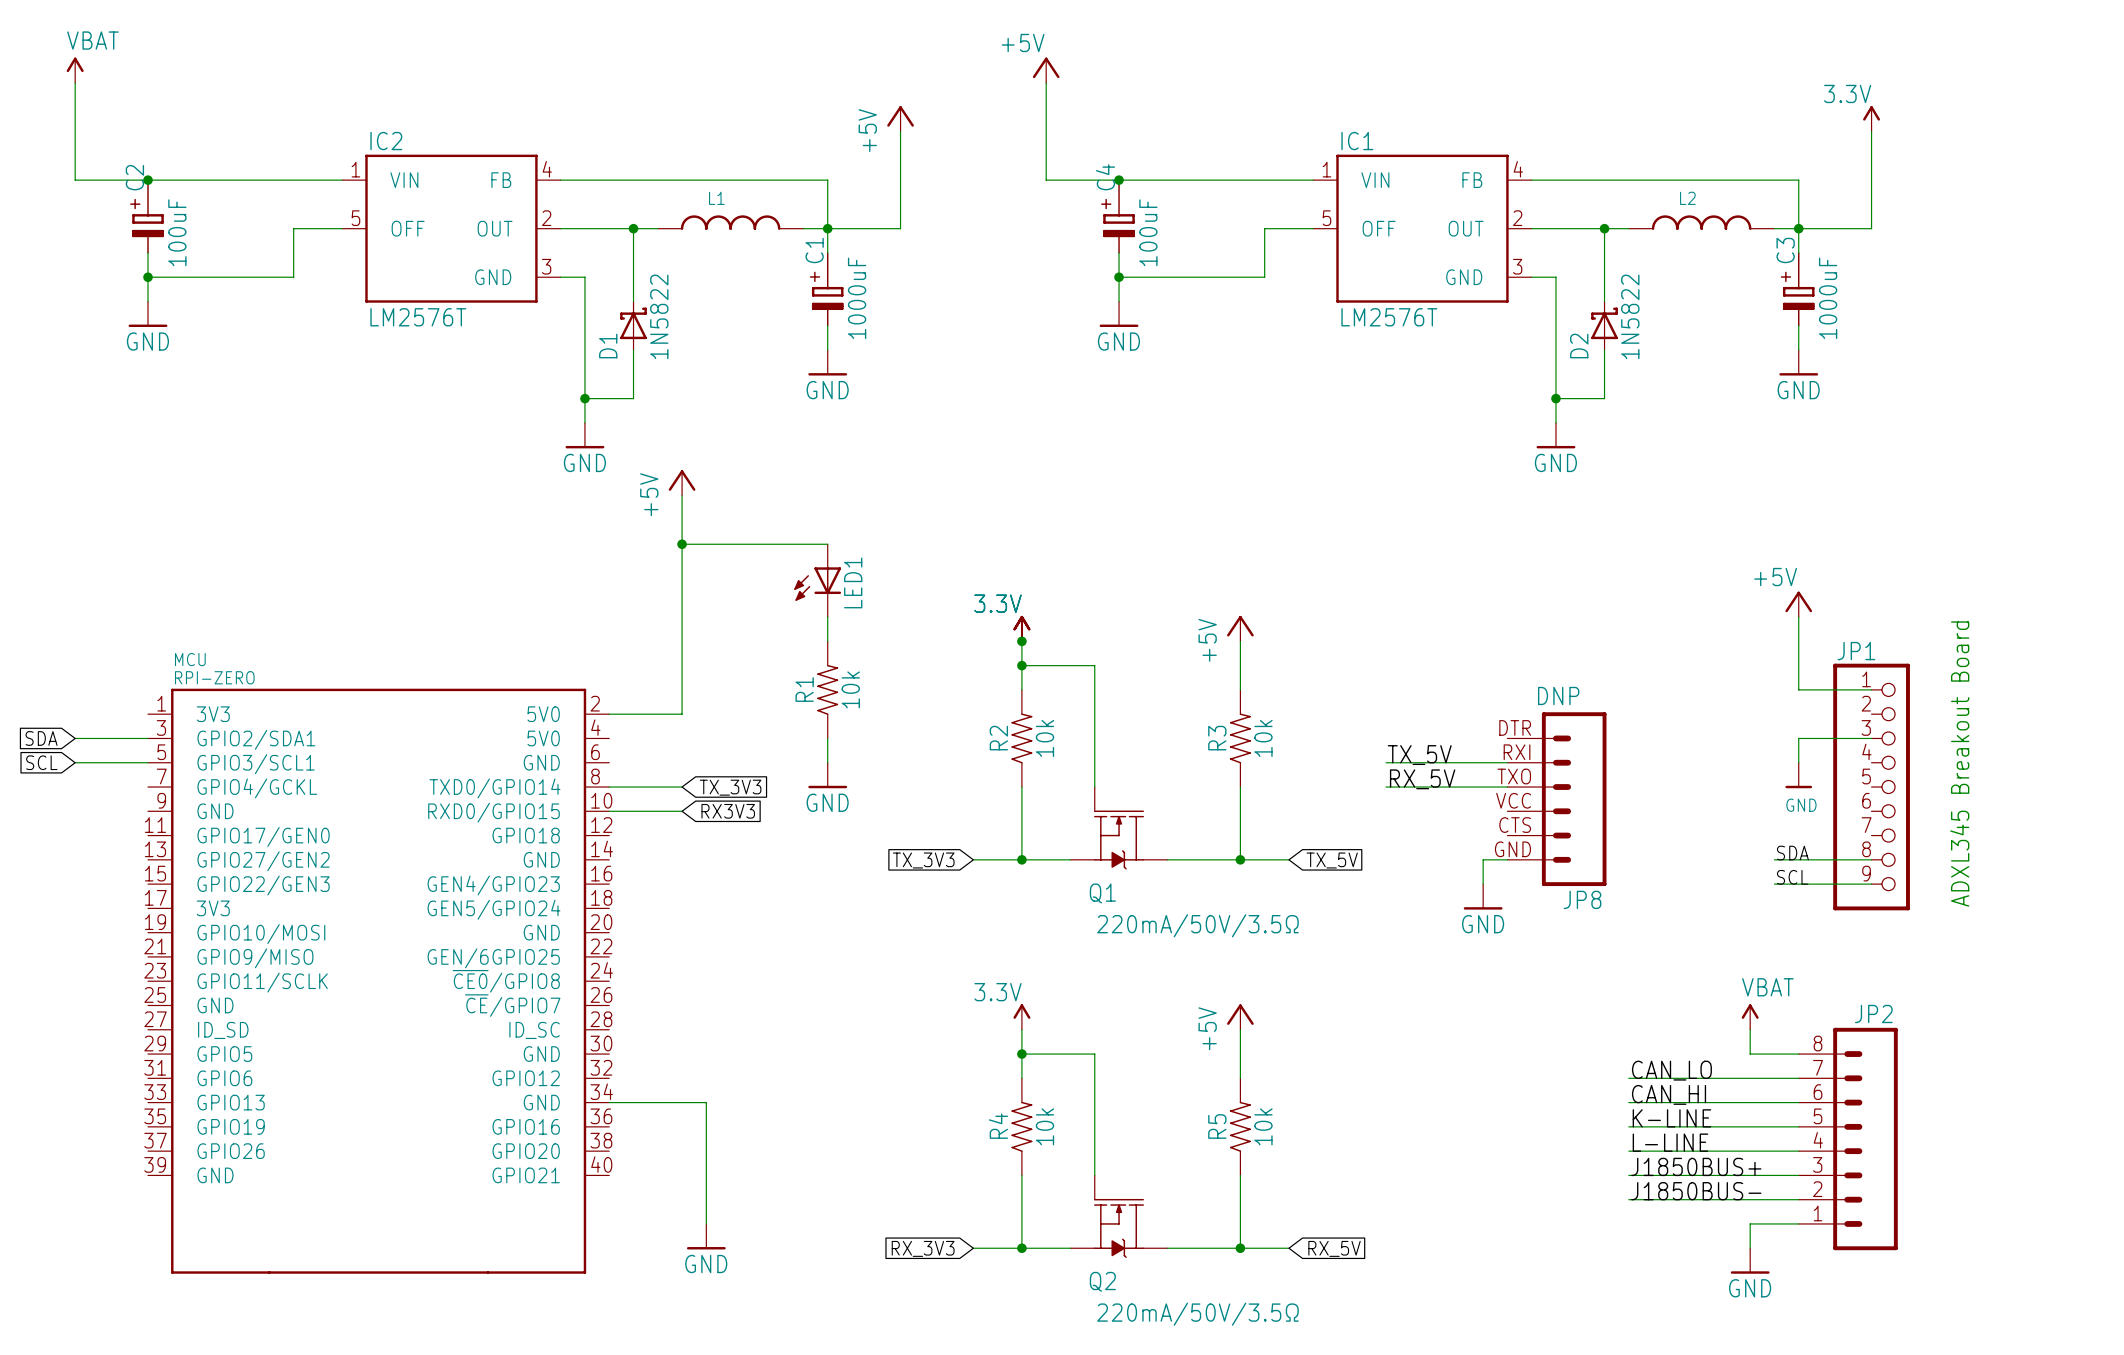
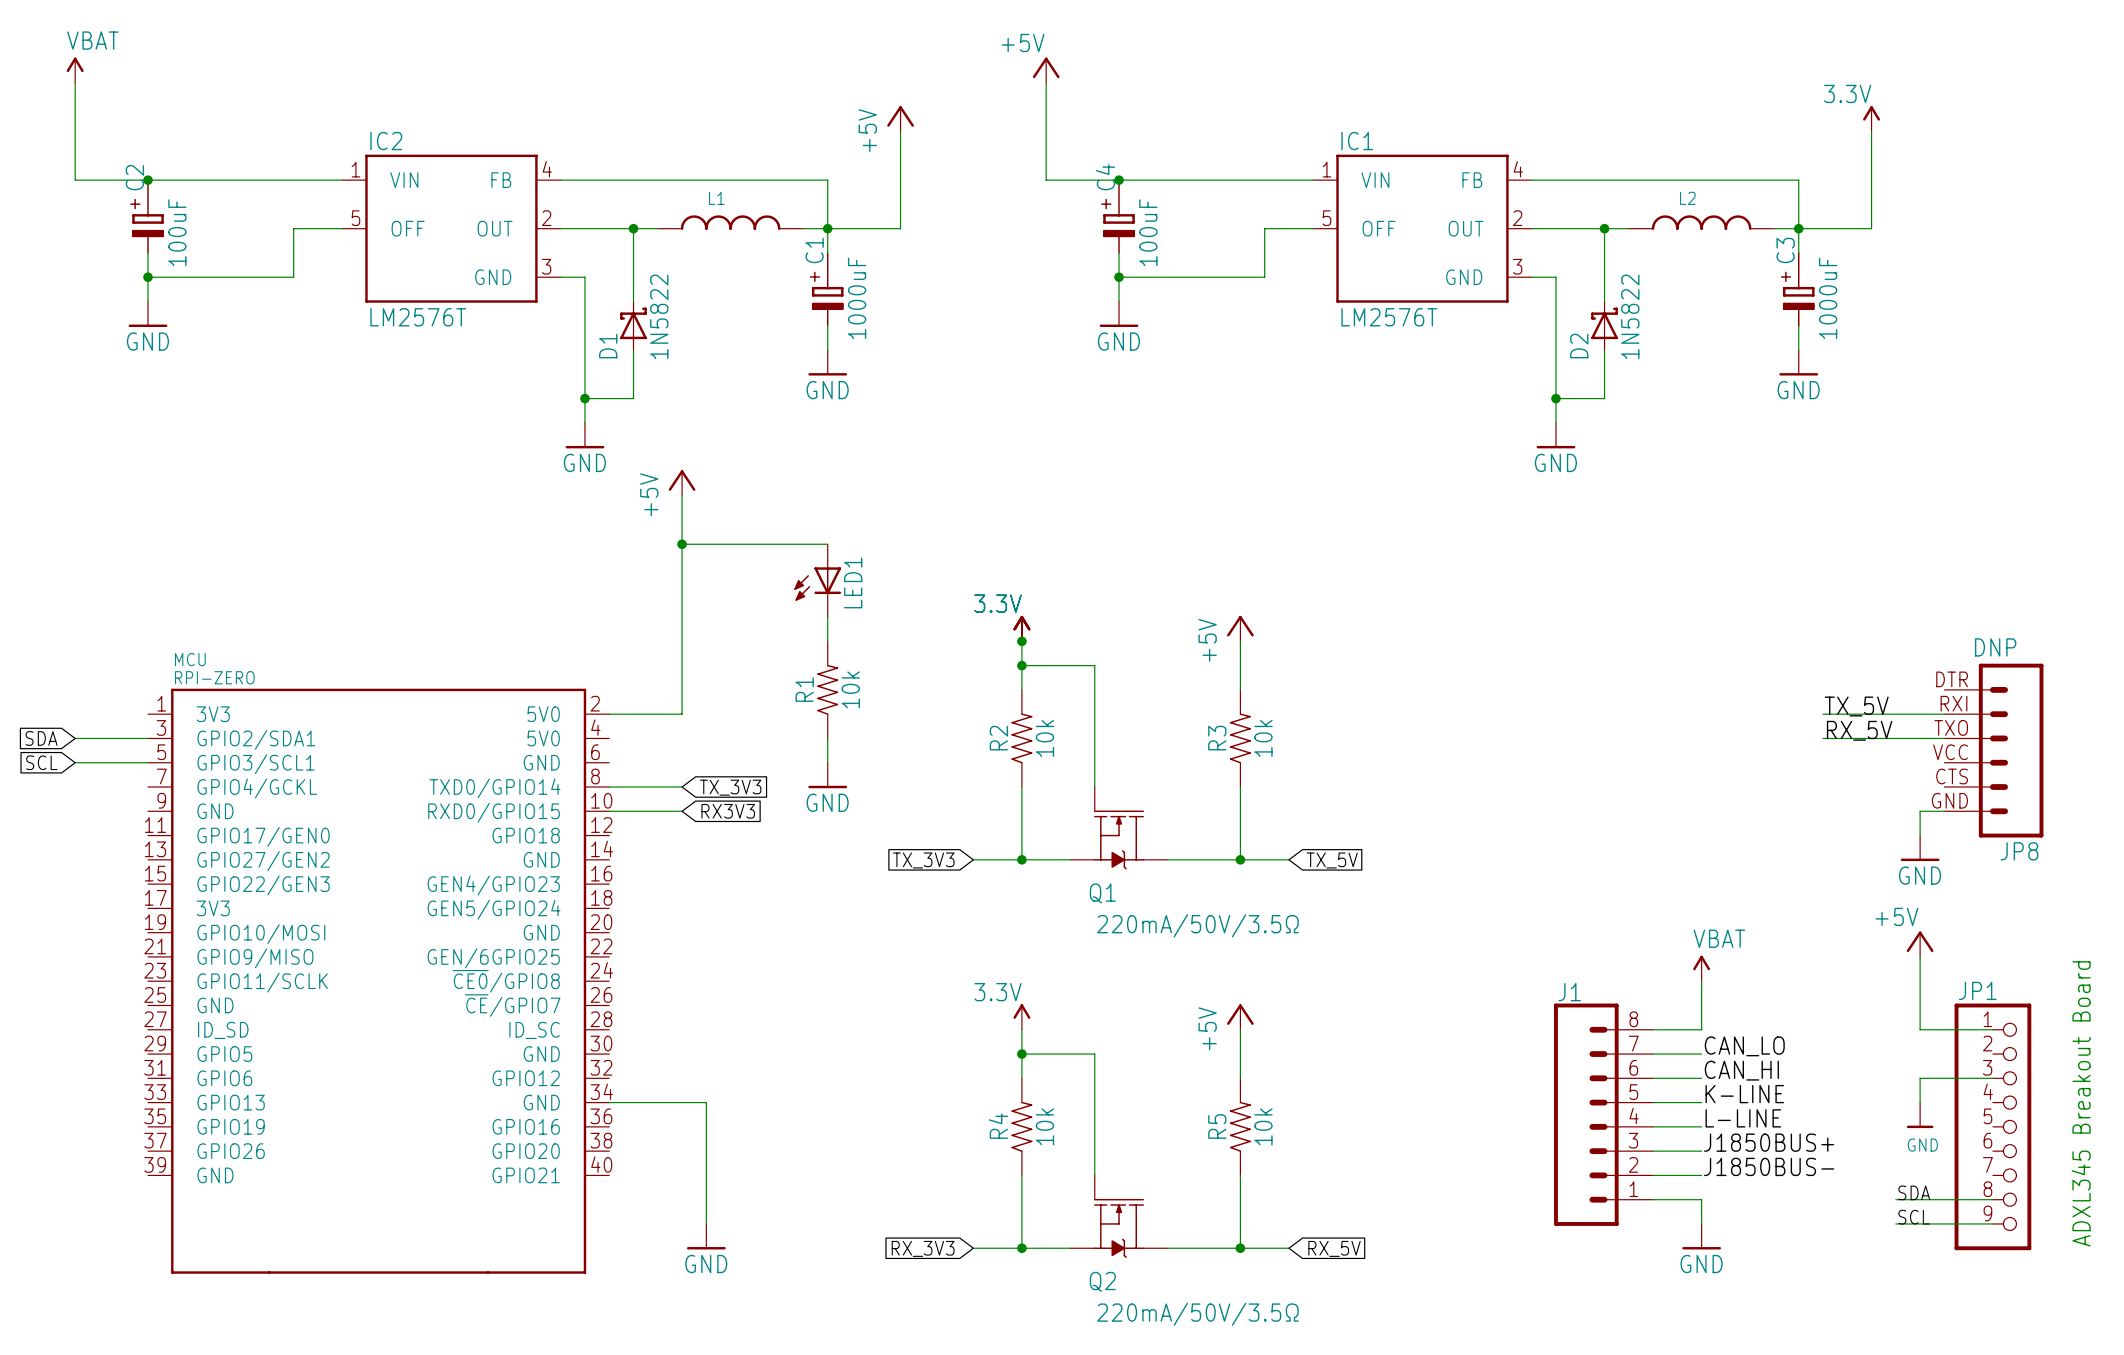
power symbol: +5V (1798, 604) -> none
wire: (1798, 617) (1798, 689) (1871, 689) -> none
label: none -> TX_5V (1856, 706)
wire: none -> (1823, 714) (1944, 714)
label: none -> RX_5V (1859, 730)
wire: (1823, 738) (1798, 738) (1798, 762) -> (1944, 811) (1920, 811) (1920, 835)
wire: none -> (1871, 738) (1944, 738)
label: TX_5V (1419, 755) -> none
wire: (1386, 762) (1507, 762) -> none
text: ADXL345 Breakout Board (1959, 764) -> none
power symbol: GND (1798, 775) -> none
label: RX_5V (1422, 779) -> none
wire: (1386, 787) (1507, 787) -> none
JP1 position: (1871, 787) -> (1992, 1126)
JP8 position: (1556, 799) -> (1993, 750)
power symbol: none -> GND (1920, 848)
label: SDA (1792, 853) -> none
wire: (1507, 859) (1483, 859) (1483, 884) -> none
wire: (1774, 859) (1871, 859) -> none
label: SCL (1792, 877) -> none
wire: (1774, 884) (1871, 884) -> none
power symbol: GND (1483, 896) -> none
power symbol: none -> +5V (1920, 944)
wire: none -> (1920, 956) (1920, 1029) (1992, 1029)
wire: none -> (1701, 981) (1701, 1029) (1653, 1029)
power symbol position: VBAT (1750, 1017) -> VBAT (1701, 968)
wire: (1750, 1029) (1750, 1054) (1798, 1054) -> none
wire: none -> (1653, 1054) (1701, 1054)
label position: CAN_LO (1671, 1070) -> CAN_LO (1744, 1046)
wire: (1701, 1078) (1798, 1078) -> none
wire: none -> (1992, 1078) (1920, 1078) (1920, 1102)
label position: CAN_HI (1669, 1094) -> CAN_HI (1741, 1070)
wire: (1701, 1102) (1798, 1102) -> none
text: none -> ADXL345 Breakout Board (2081, 1103)
J1: none -> (1603, 1114)
power symbol: none -> GND (1920, 1115)
label position: K-LINE (1671, 1118) -> K-LINE (1744, 1094)
wire: (1701, 1126) (1798, 1126) -> none
JP2: (1848, 1139) -> none
label position: L-LINE (1670, 1142) -> L-LINE (1743, 1118)
wire: (1701, 1151) (1798, 1151) -> (1895, 1223) (1992, 1223)
label position: J1850BUS+ (1696, 1166) -> J1850BUS+ (1769, 1142)
wire: (1701, 1175) (1798, 1175) -> (1895, 1199) (1992, 1199)
label position: J1850BUS- (1696, 1191) -> J1850BUS- (1769, 1166)
label: none -> SDA (1914, 1192)
wire: (1701, 1199) (1798, 1199) -> (1701, 1199) (1701, 1223)
label: none -> SCL (1914, 1217)
wire: (1798, 1223) (1750, 1223) (1750, 1248) -> none
power symbol position: GND (1750, 1260) -> GND (1701, 1236)

